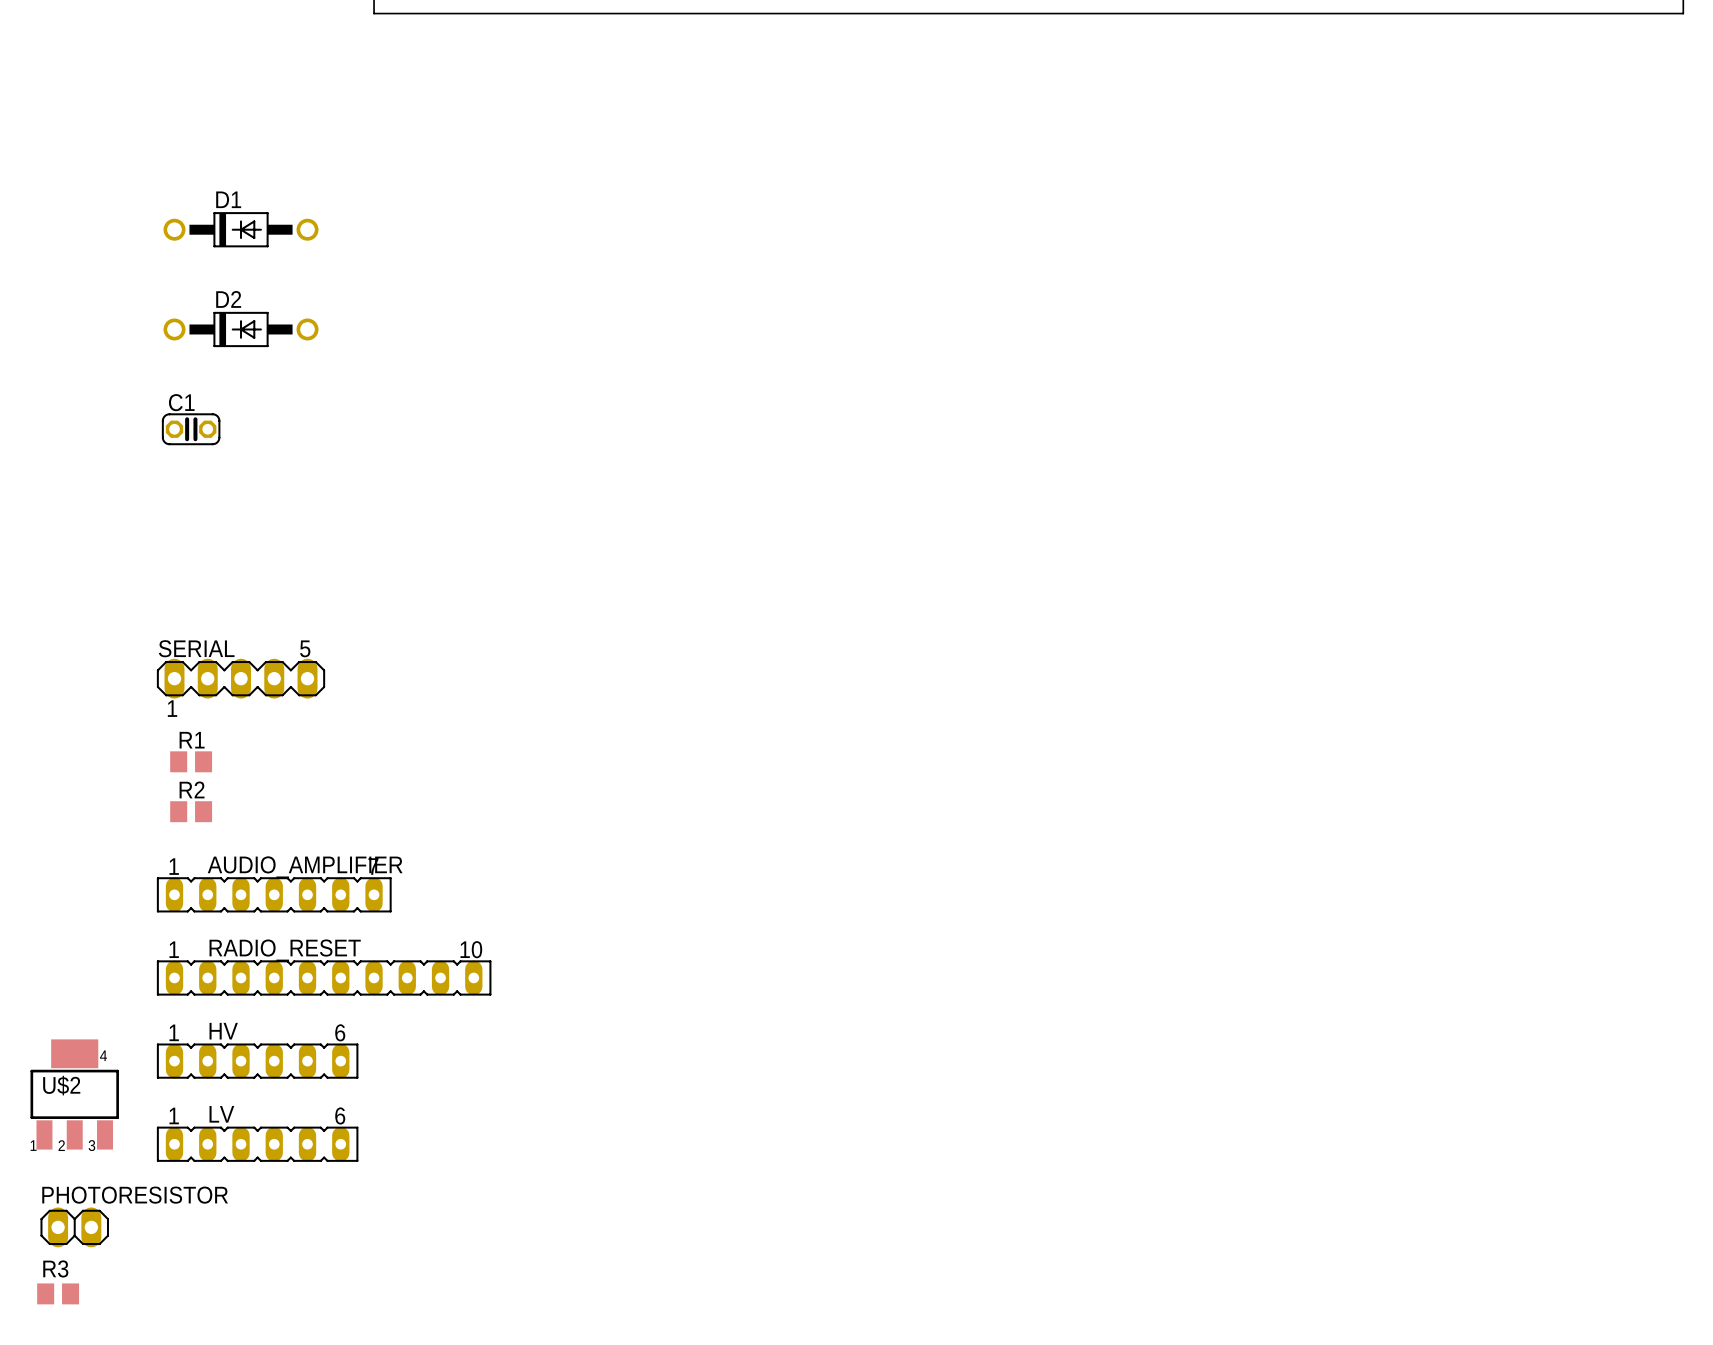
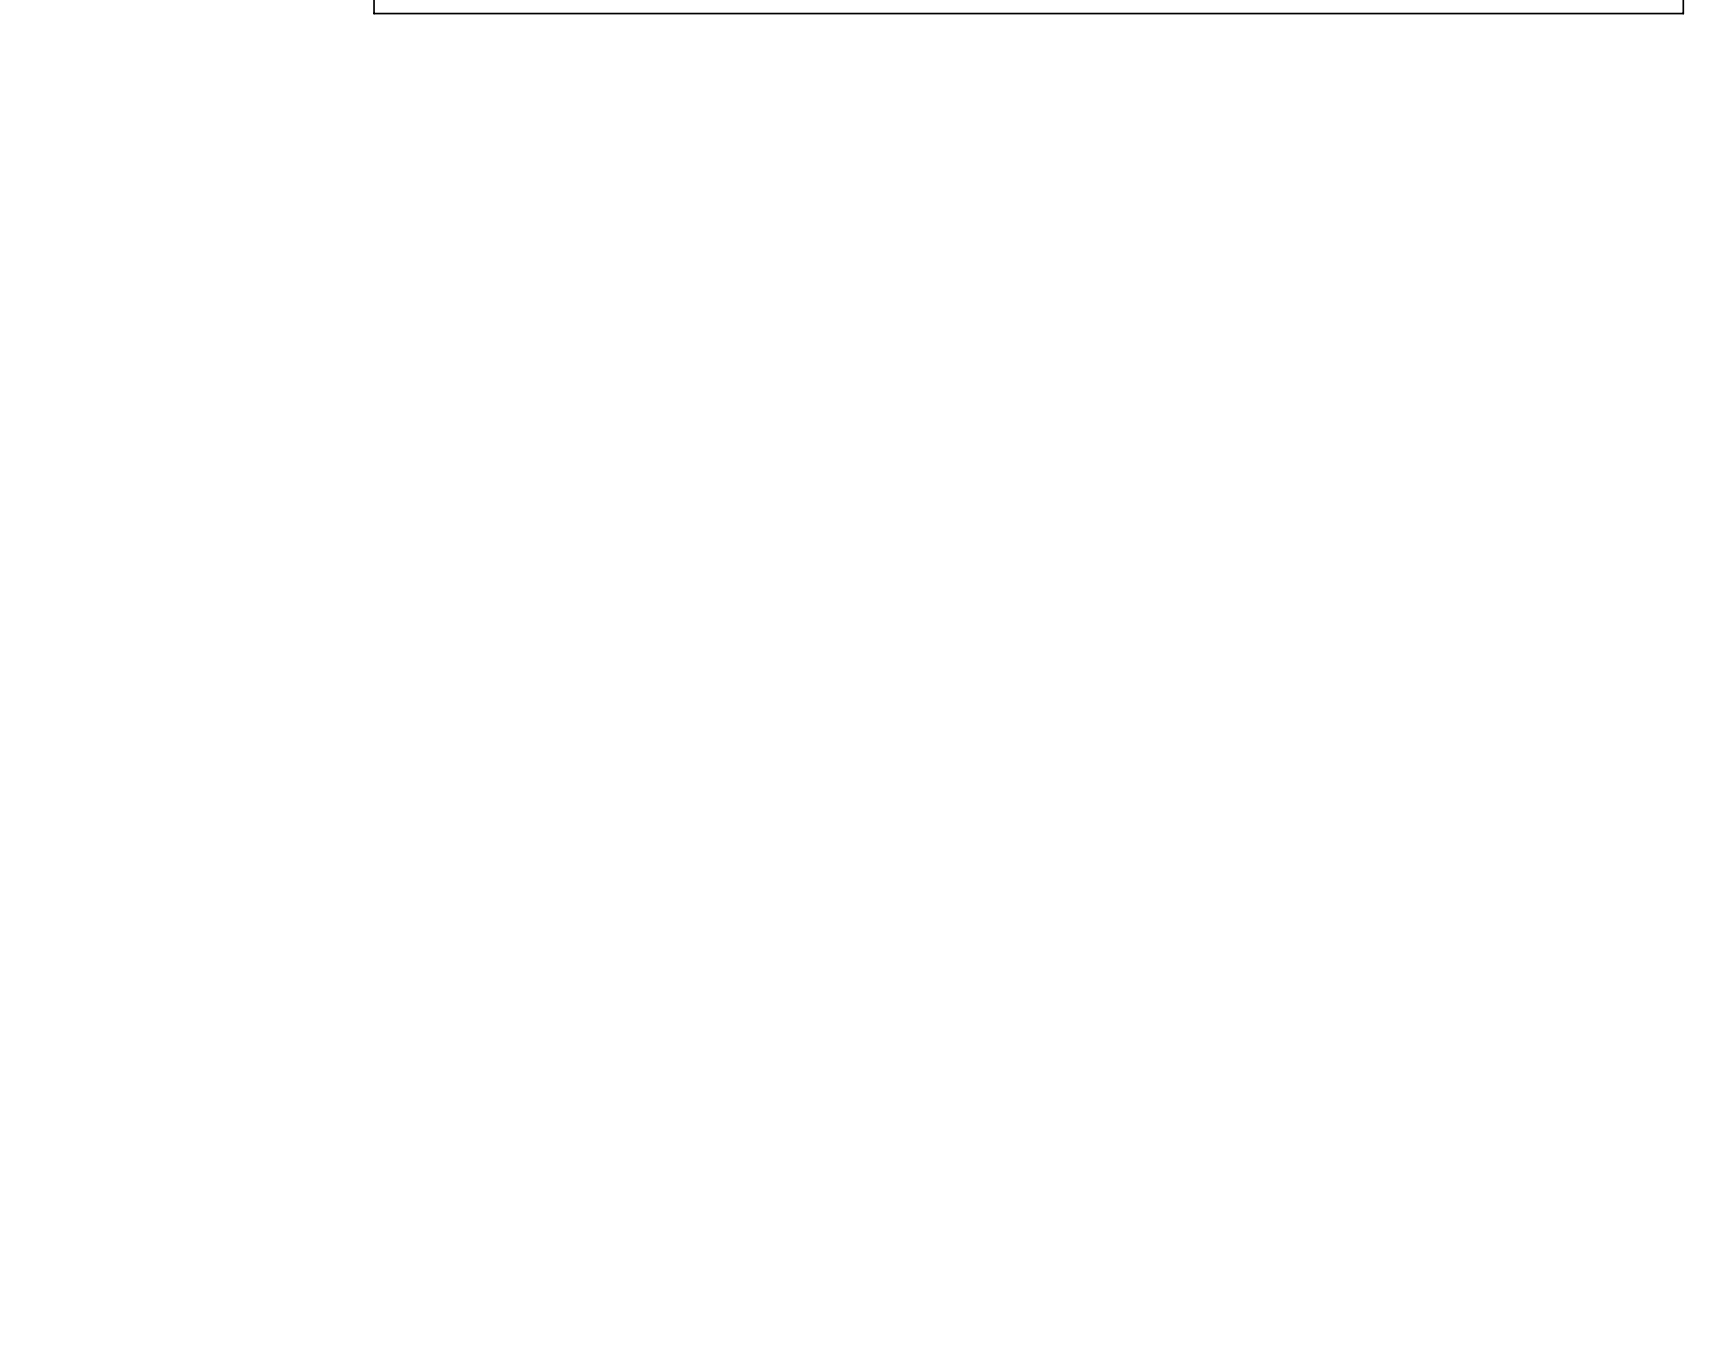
D1: (241, 229) -> none
D2: (241, 329) -> none
C1: (191, 429) -> none
SERIAL: (241, 678) -> none
R1: (191, 761) -> none
R2: (191, 811) -> none
AUDIO_AMPLIFIER: (274, 894) -> none
RADIO_RESET: (324, 977) -> none
HV: (257, 1061) -> none
U$2: (74, 1094) -> none
LV: (257, 1144) -> none
PHOTORESISTOR: (74, 1227) -> none
R3: (58, 1293) -> none

